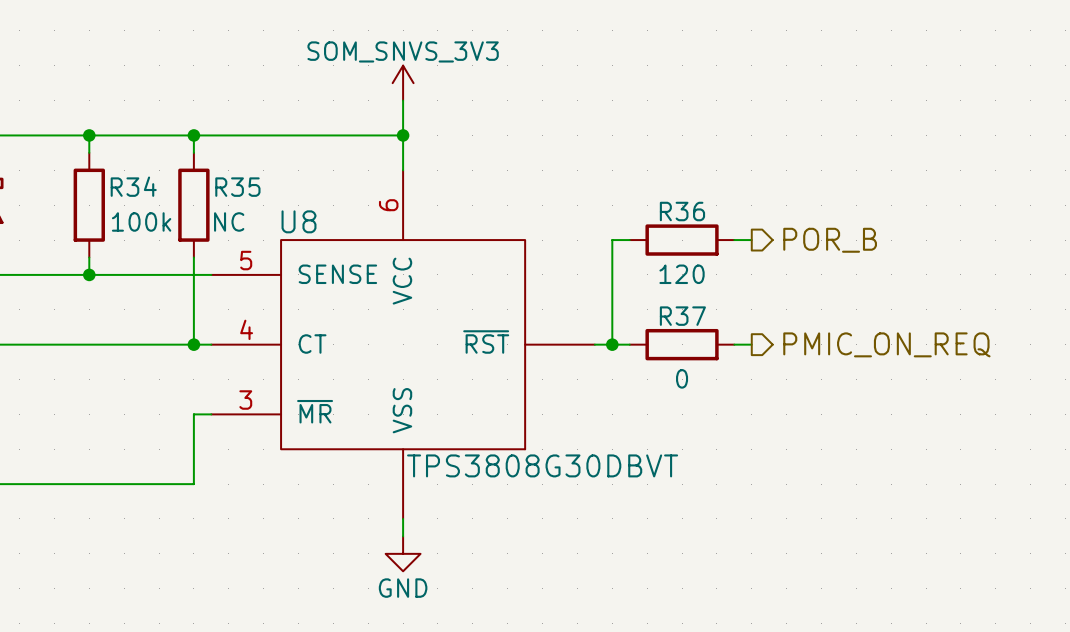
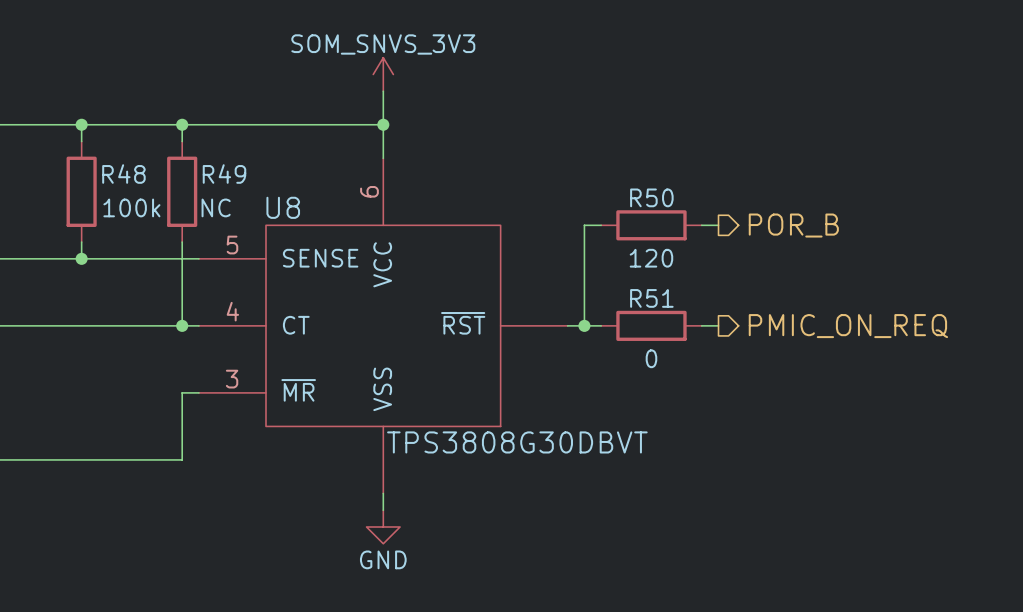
R34 name: R34 (133, 186) -> R48 (123, 174)
R35 name: R35 (237, 187) -> R49 (224, 174)
R36 name: R36 (682, 211) -> R50 (651, 197)
R37 name: R37 (682, 316) -> R51 (651, 298)

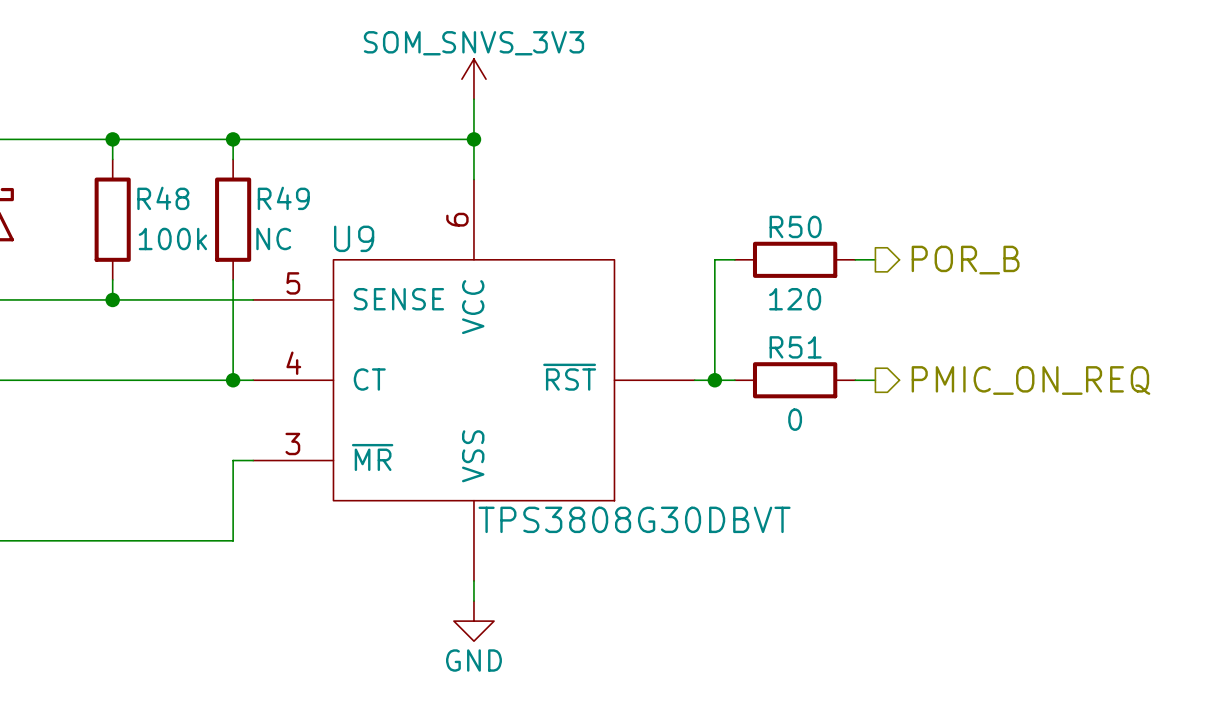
U8 name: U8 (283, 207) -> U9 (354, 238)

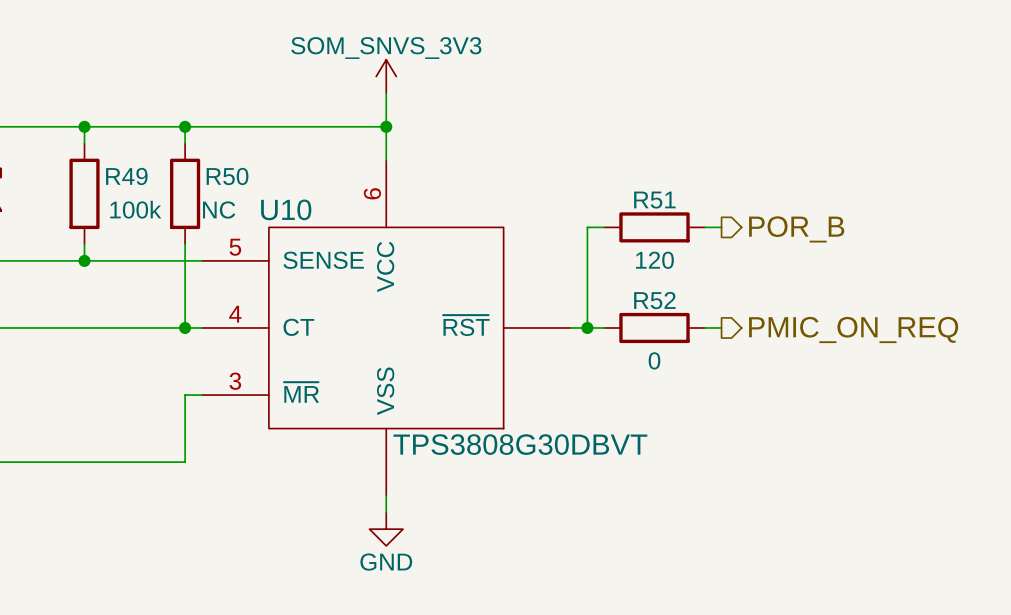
R48 name: R48 (163, 198) -> R49 (126, 176)
R49 name: R49 (283, 198) -> R50 (227, 176)
R50 name: R50 (795, 226) -> R51 (654, 200)
U9 name: U9 (354, 238) -> U10 (286, 209)
R51 name: R51 (795, 347) -> R52 (654, 300)

